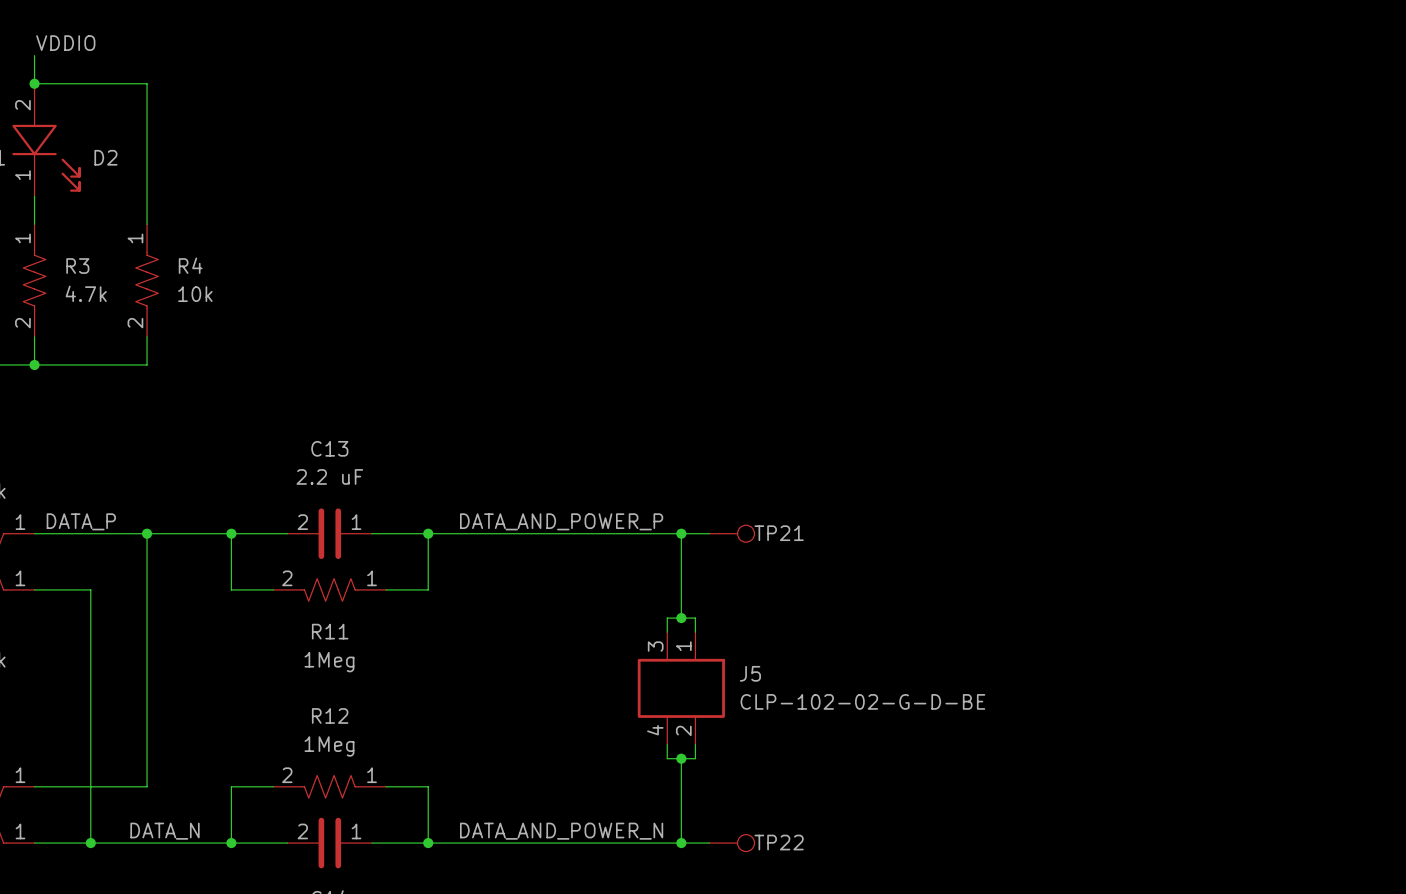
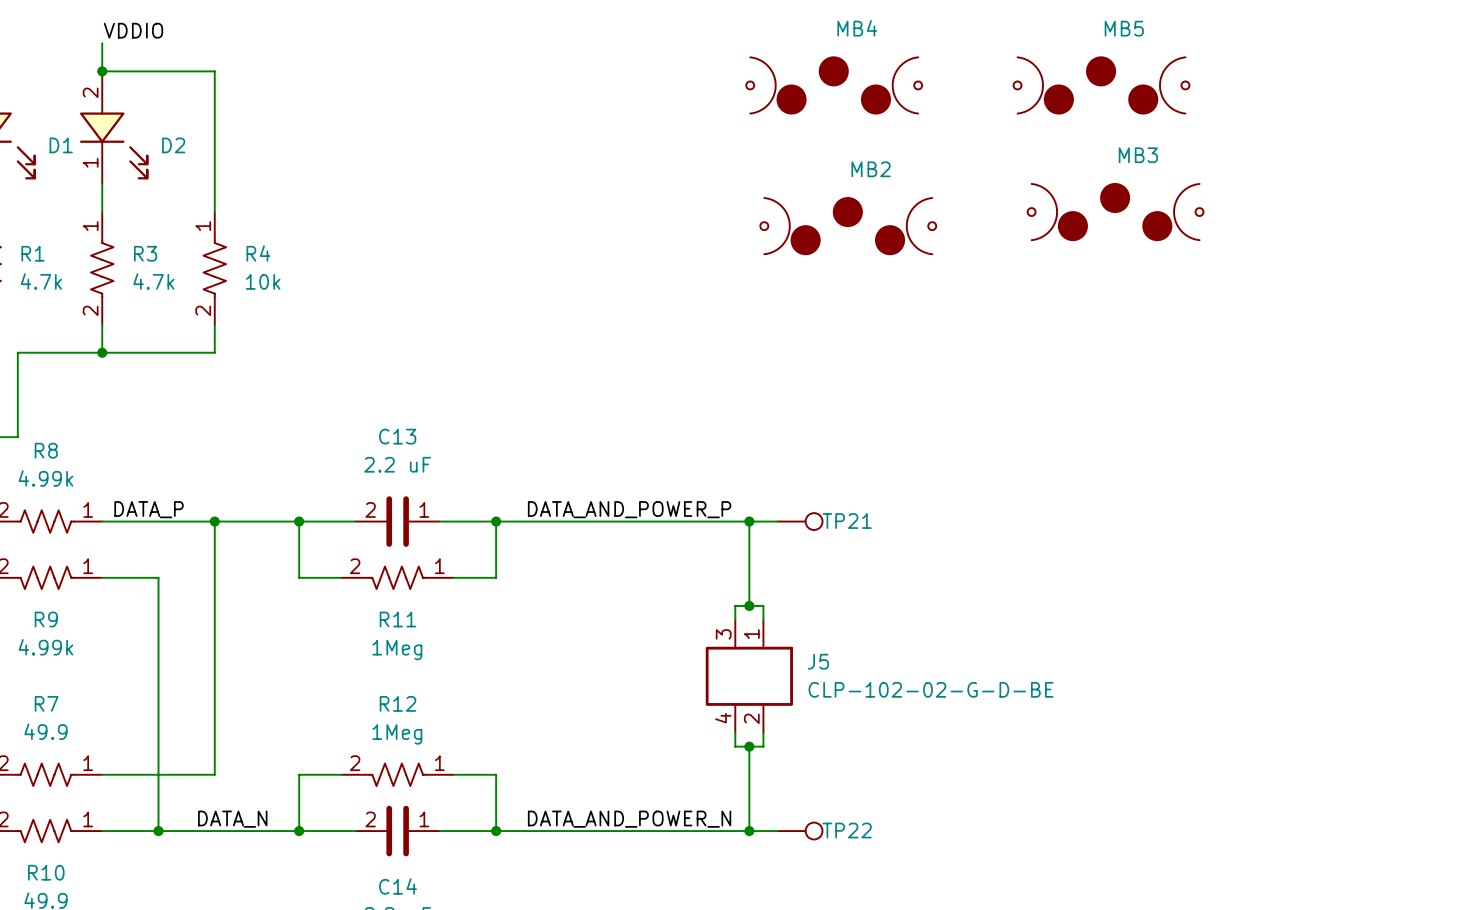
MB4: none -> (834, 85)
MB5: none -> (1101, 85)
MB3: none -> (1115, 212)
MB2: none -> (848, 226)

